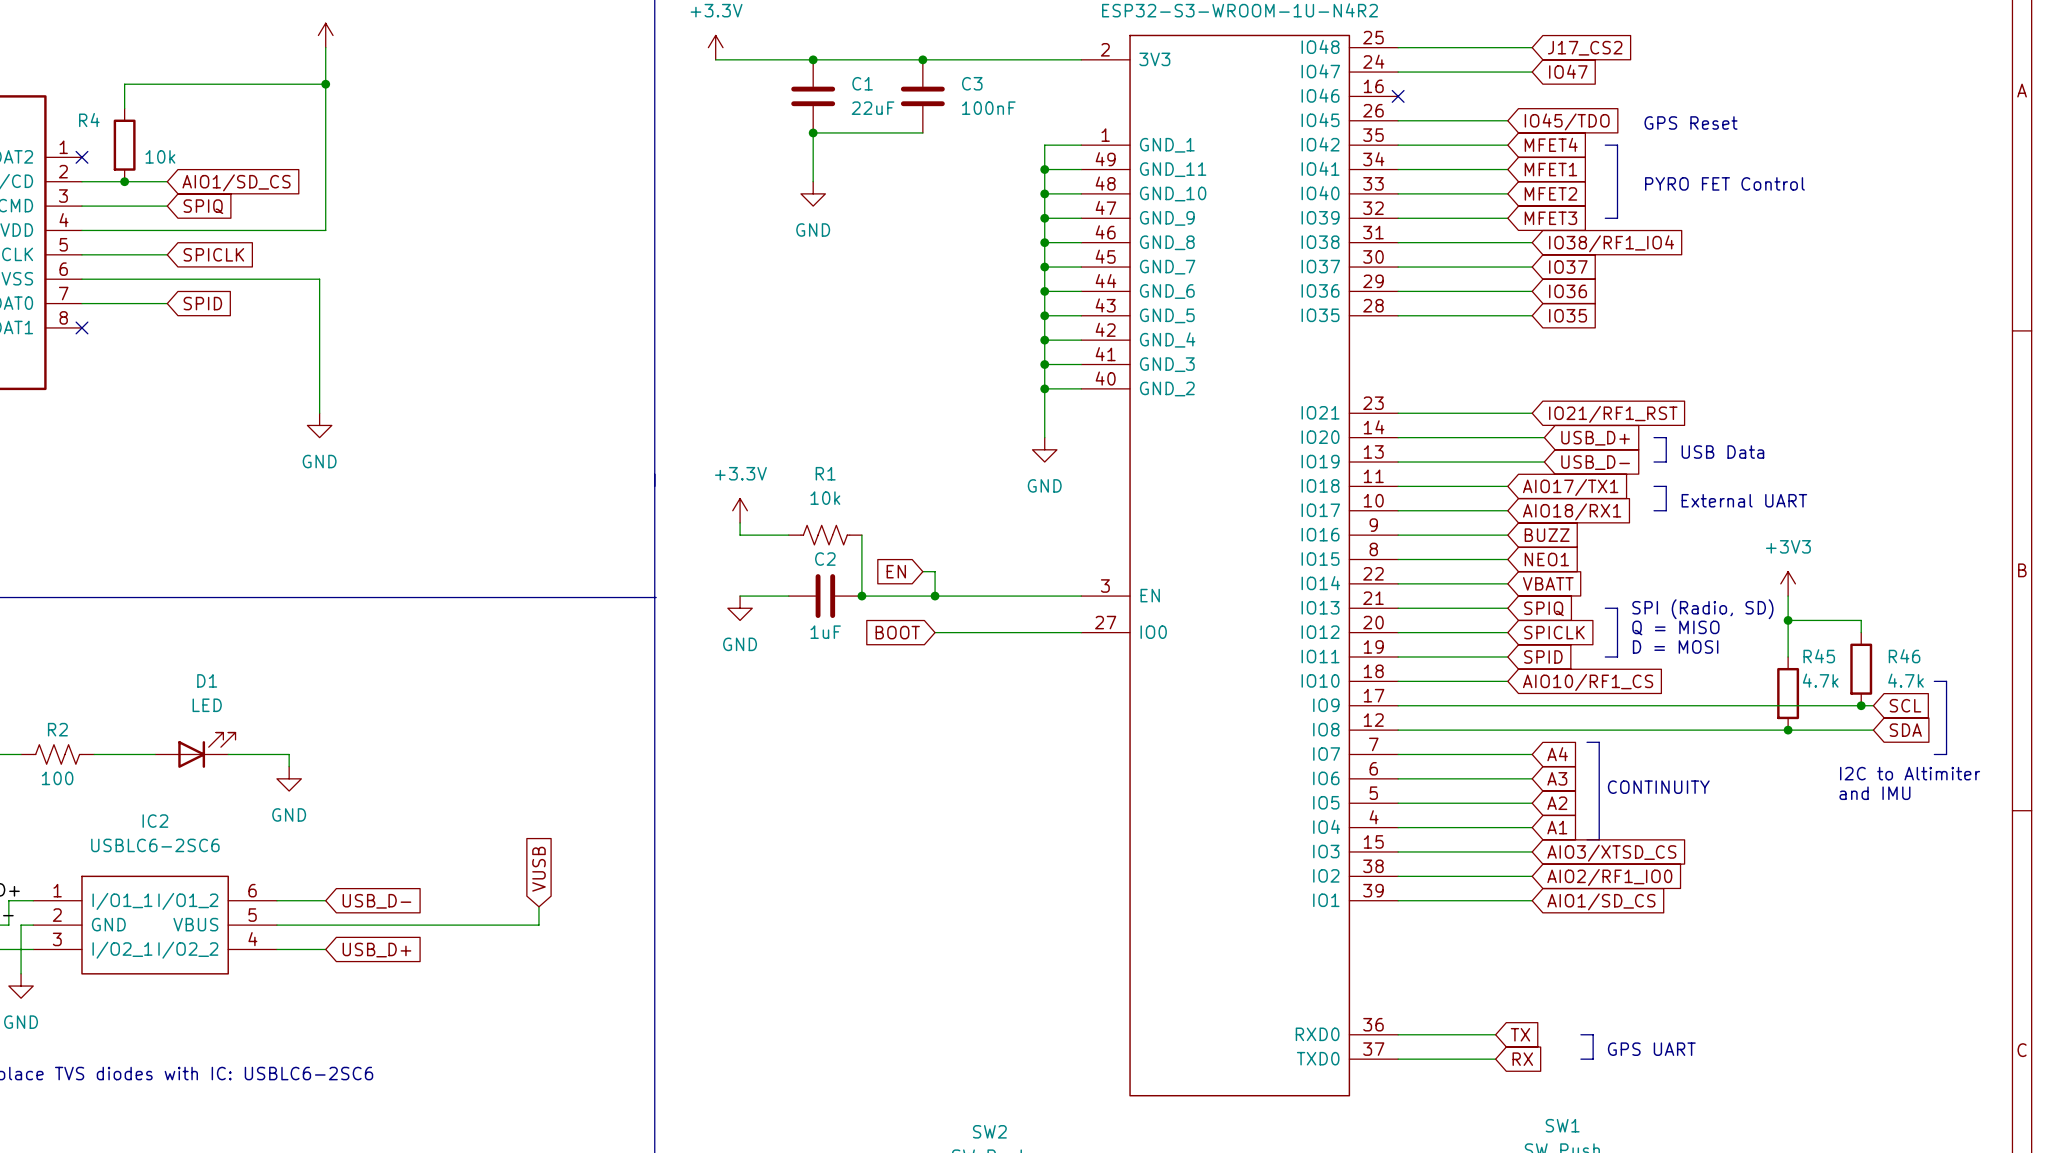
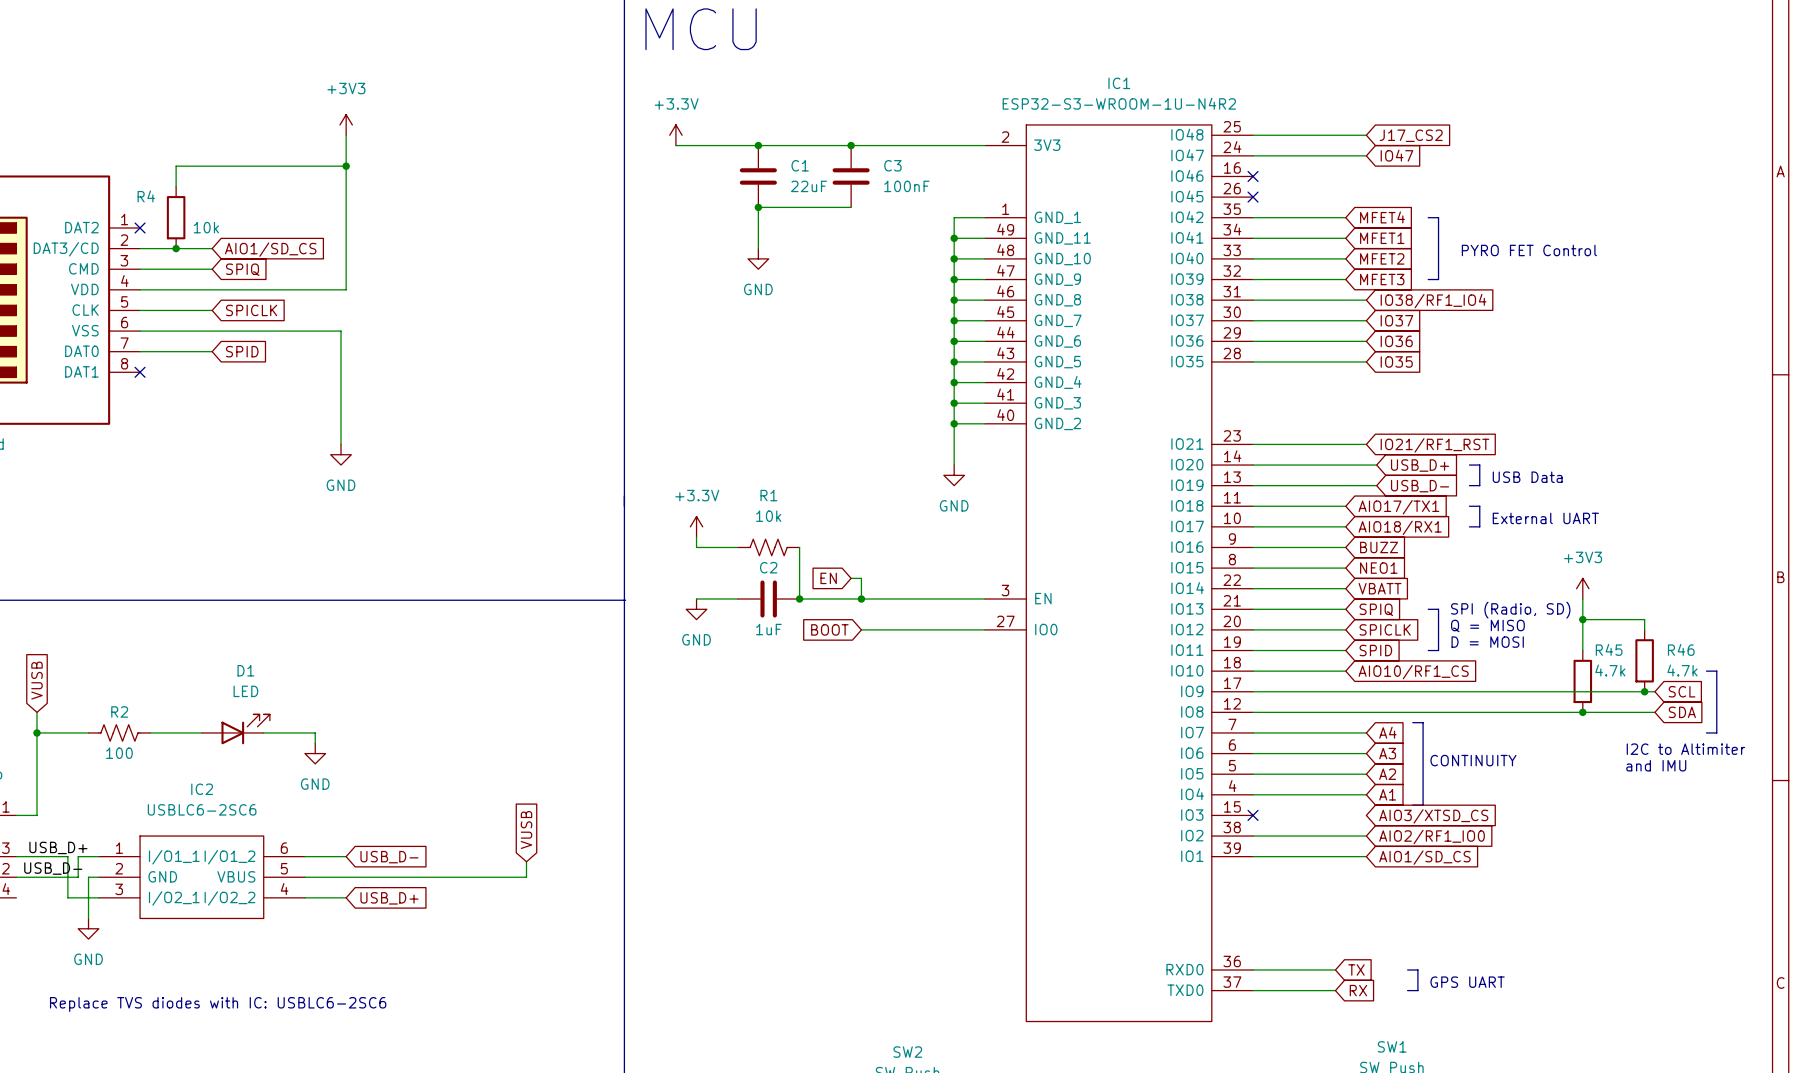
wire: (1398, 120) (1507, 120) -> none
no-connect mark: none -> (1253, 197)
global label: IO45/TDO (1567, 121) -> none
text: GPS Reset (1691, 122) -> none
wire: (1398, 851) (1532, 851) -> none
no-connect mark: none -> (1253, 815)

